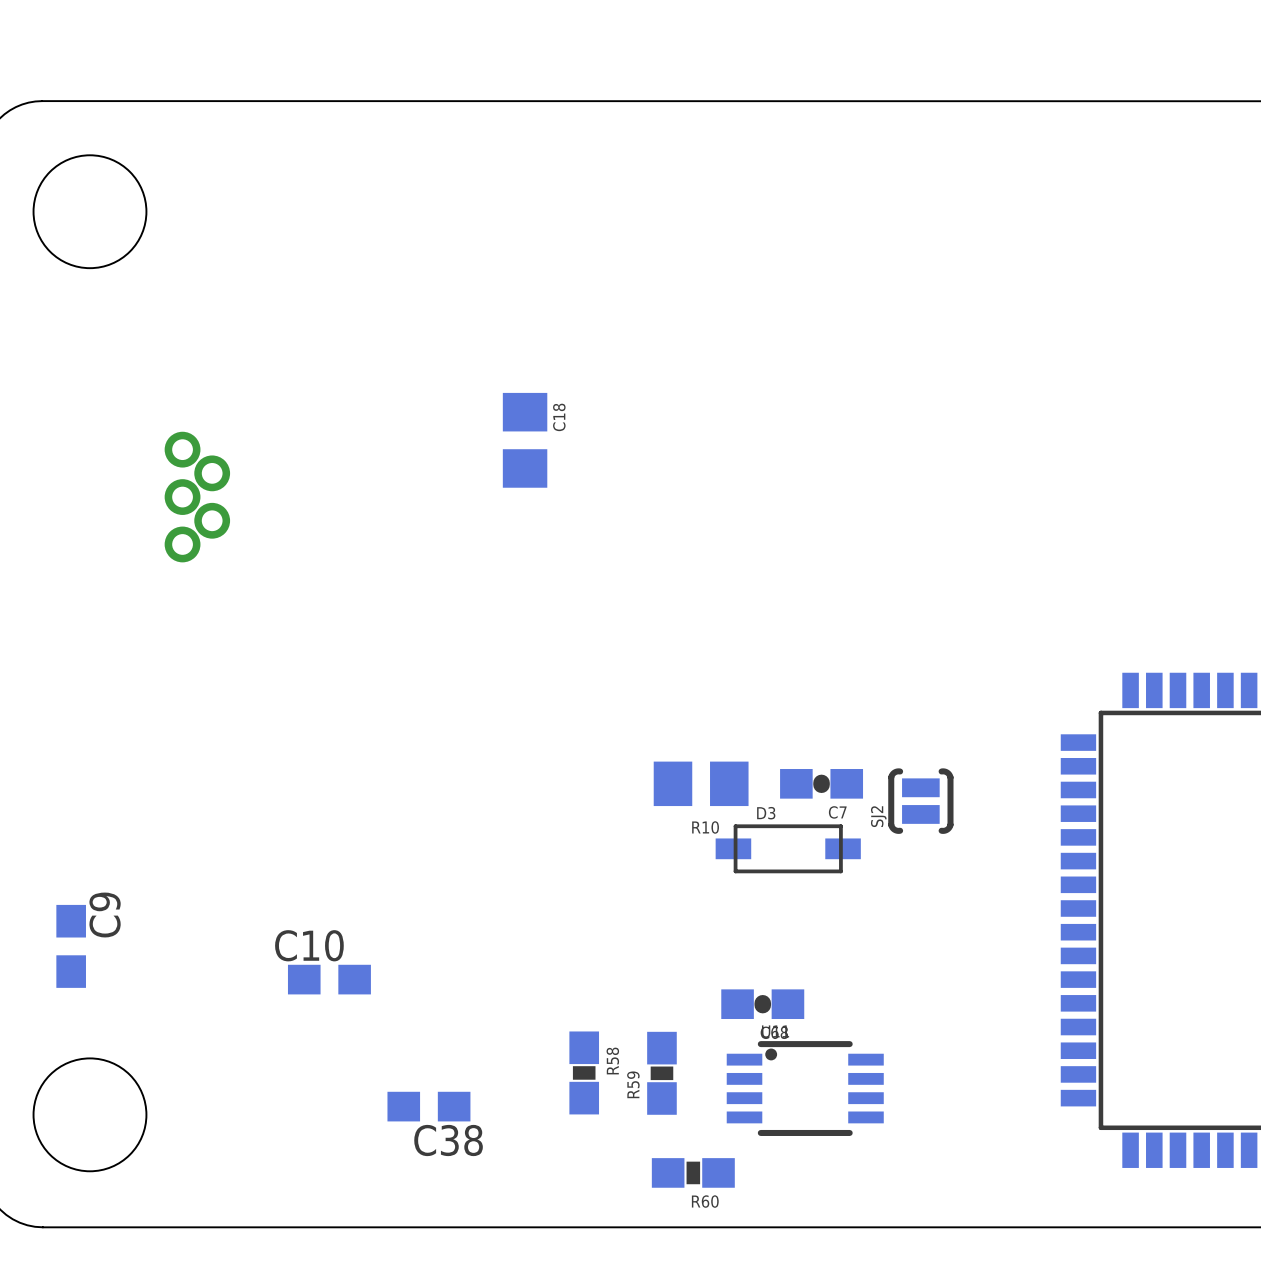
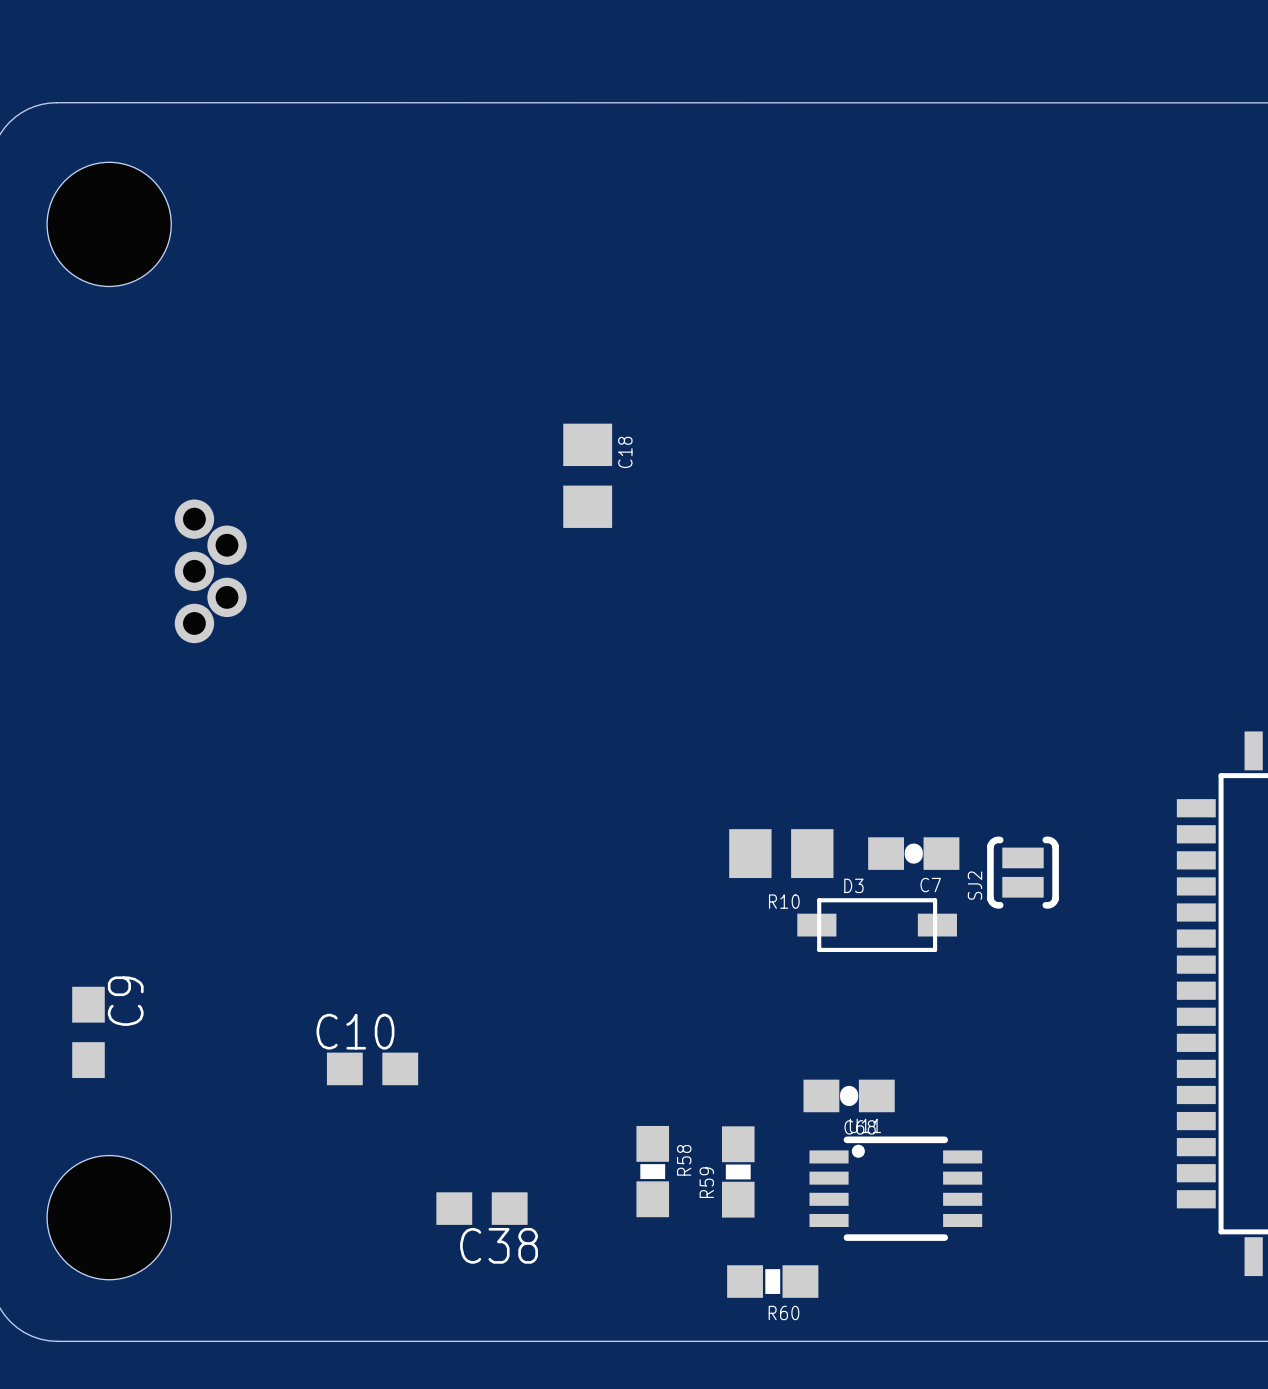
part position: (197, 497) -> (210, 571)

